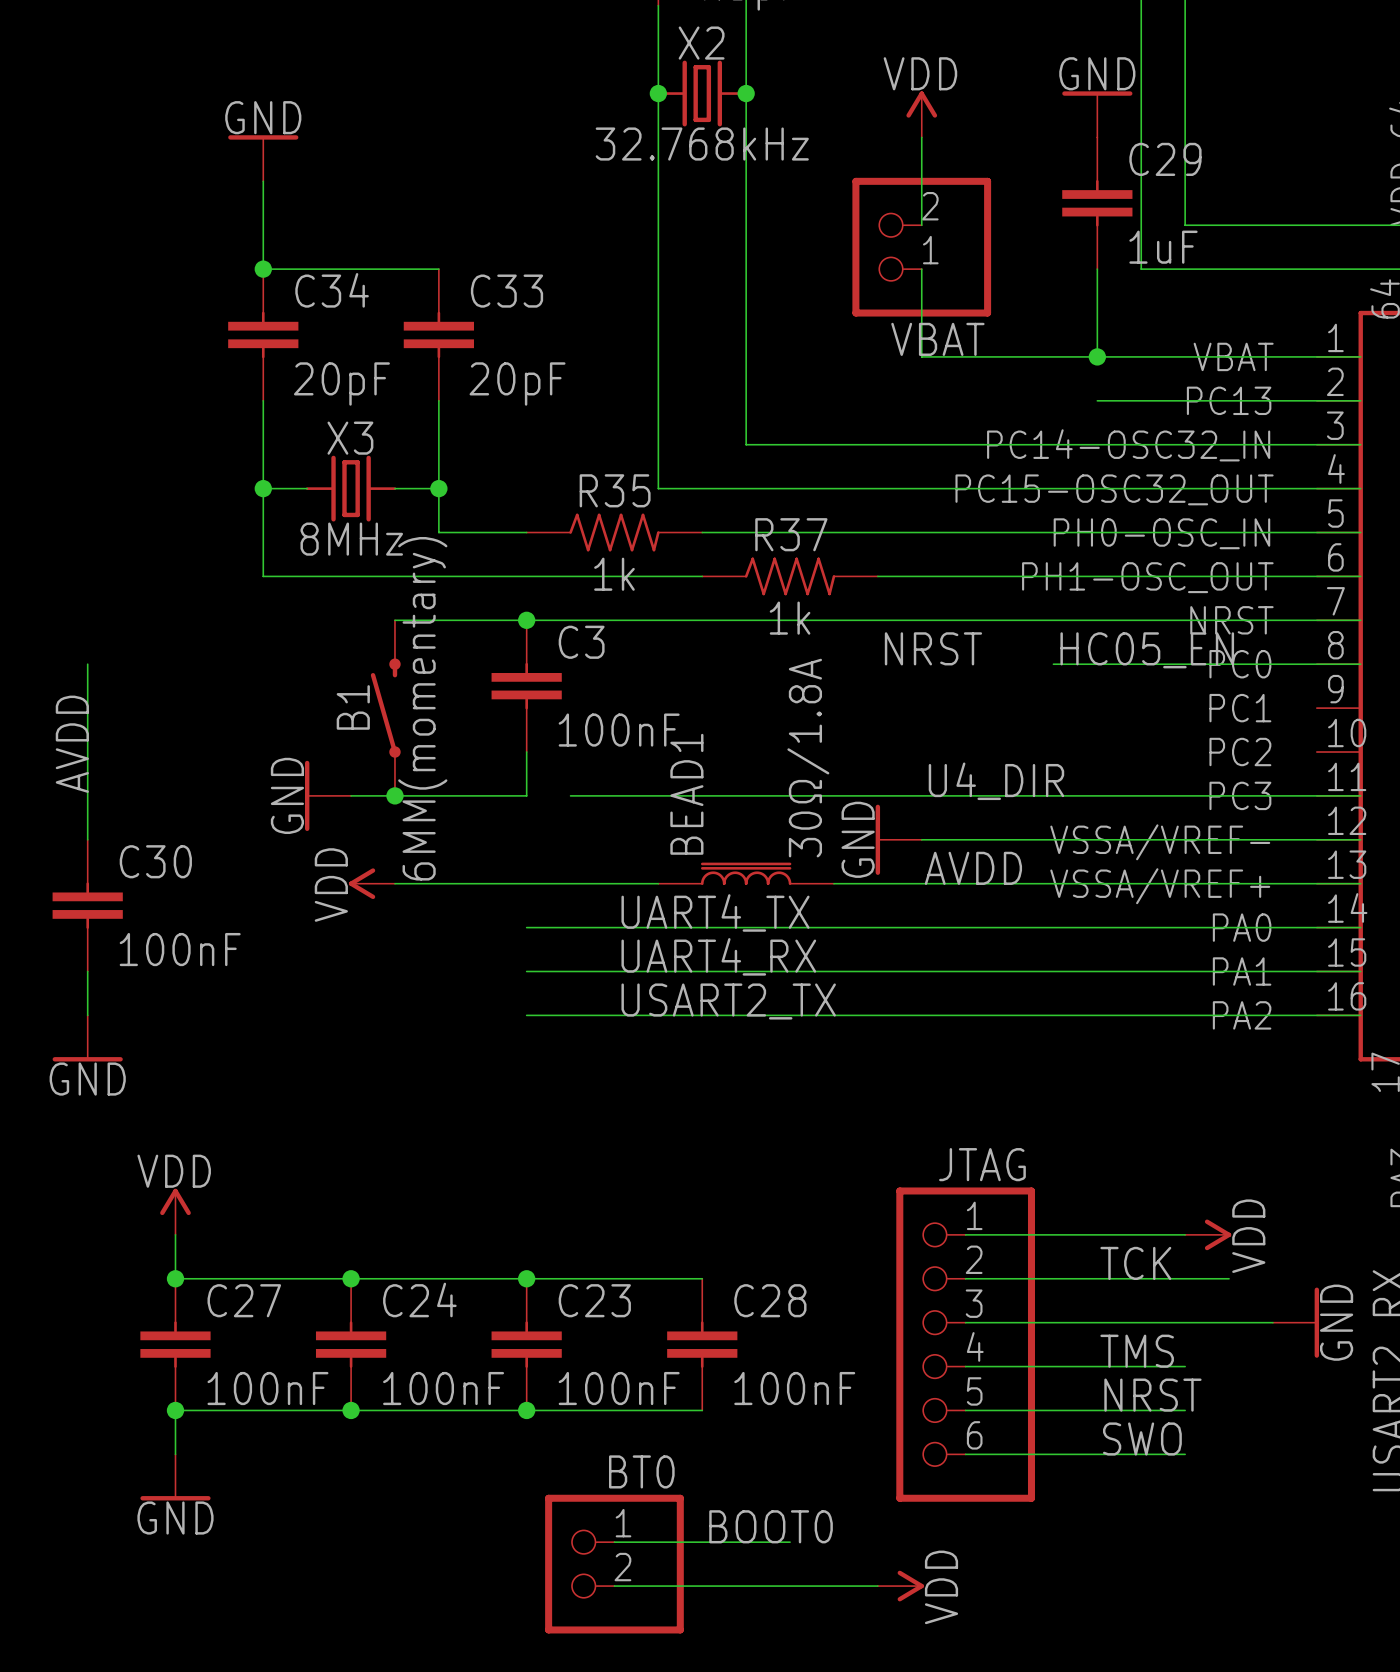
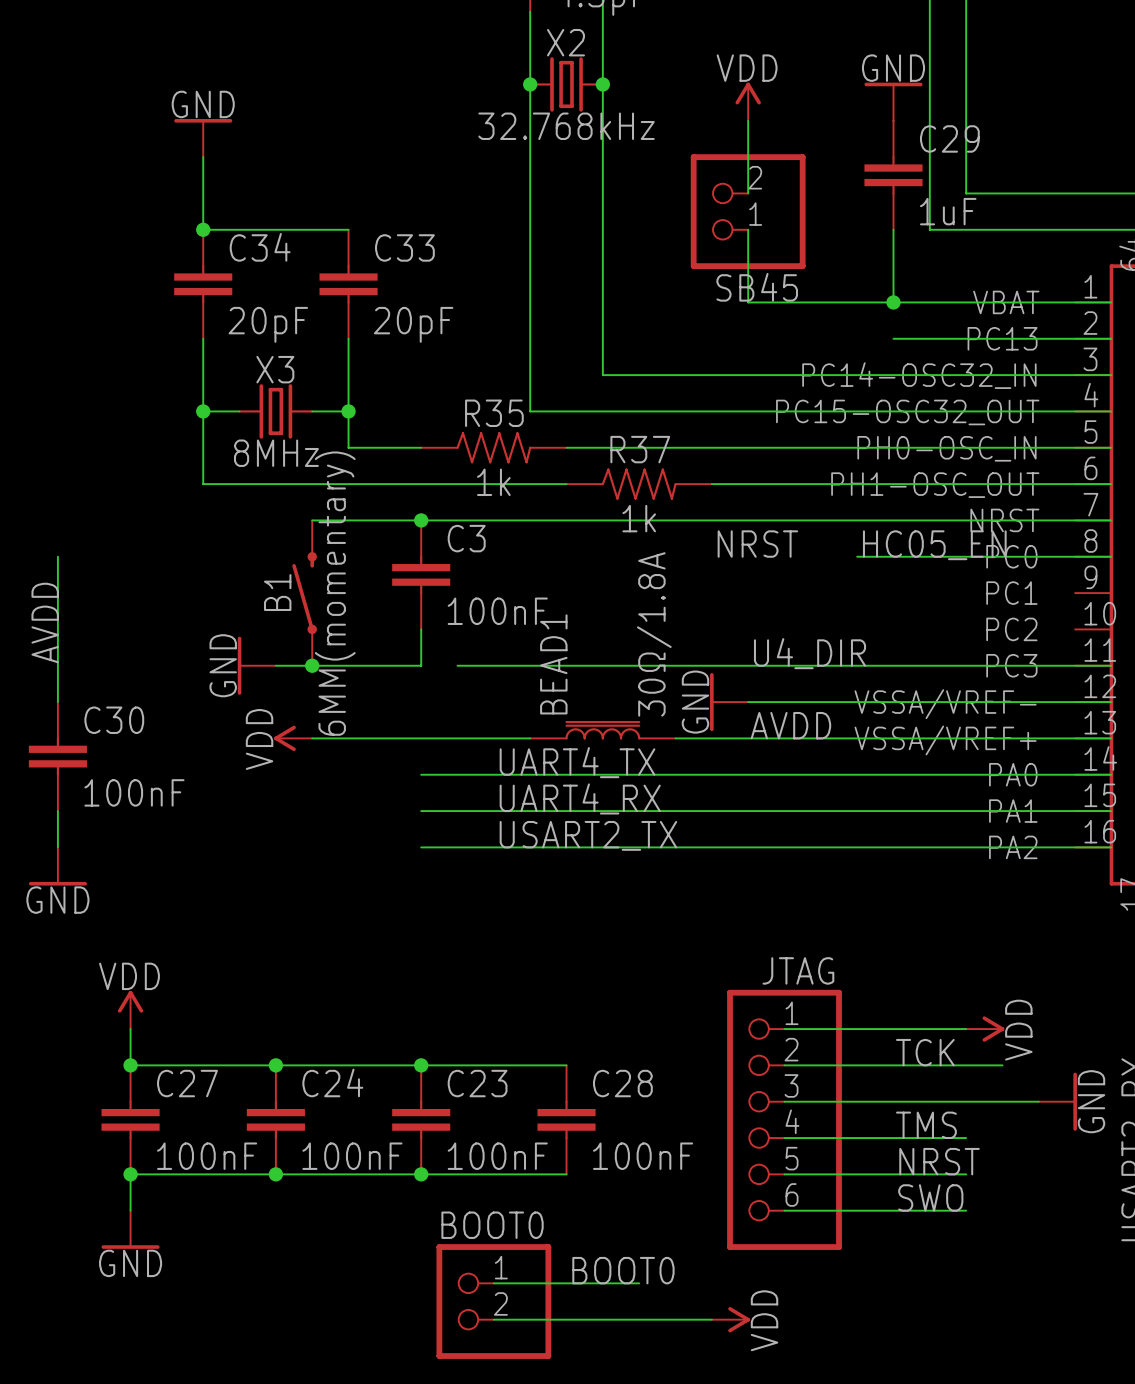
VBAT name: VBAT (937, 339) -> SB45 (757, 287)
BT0 name: BT0 (641, 1471) -> BOOT0 (492, 1225)

